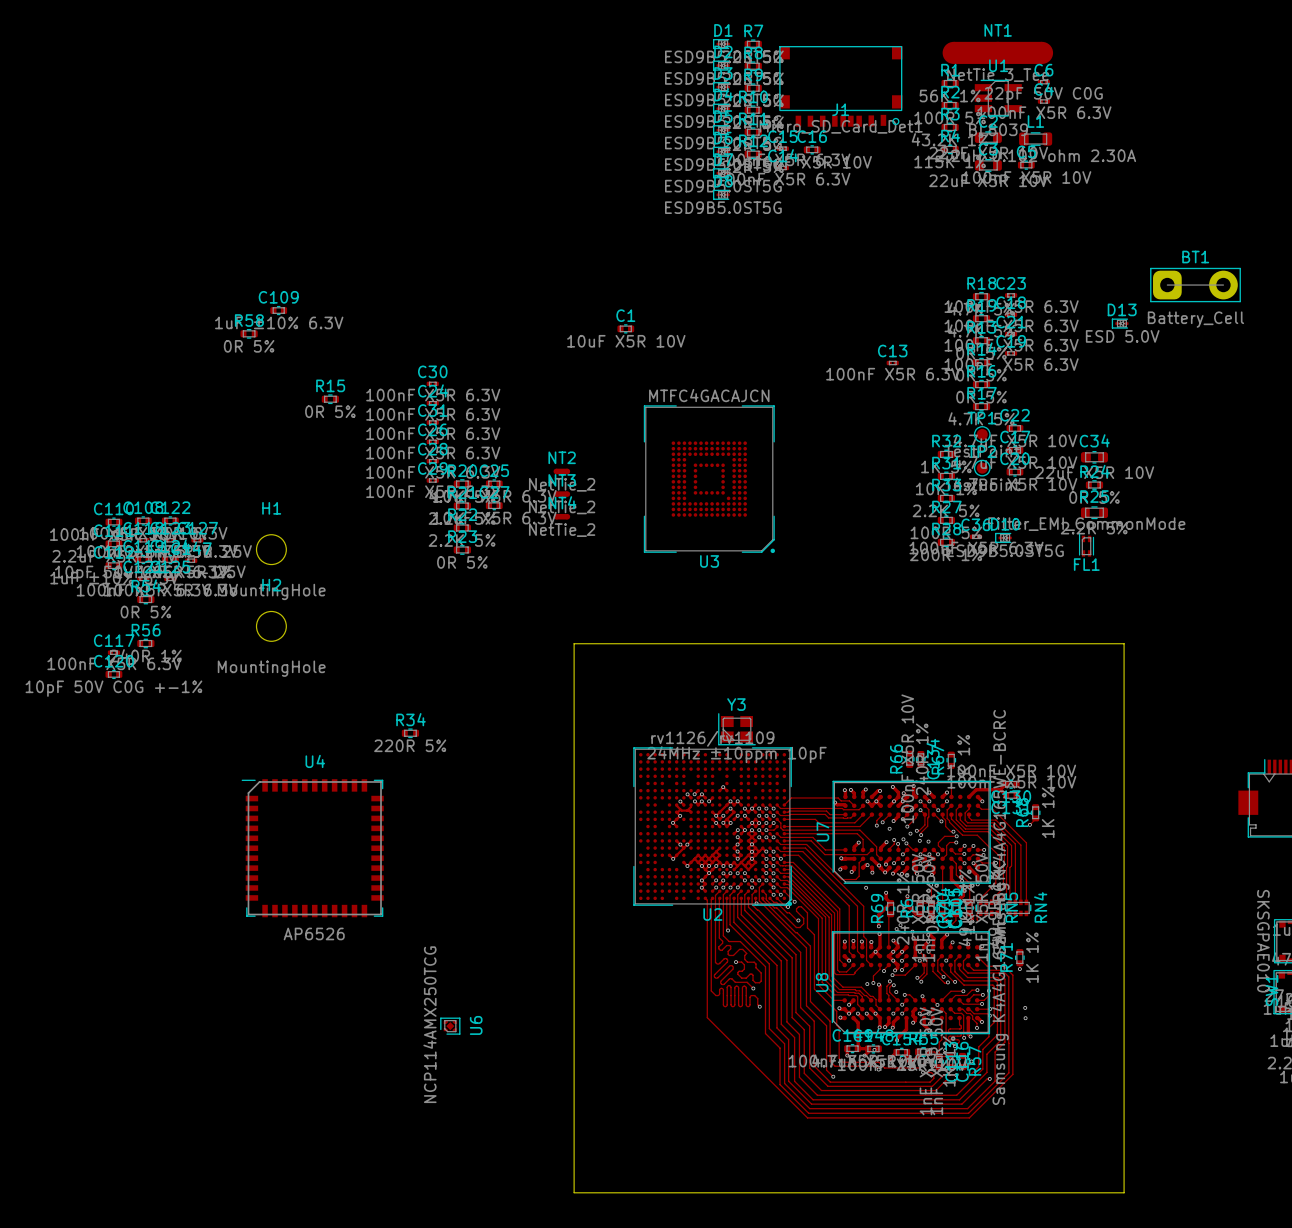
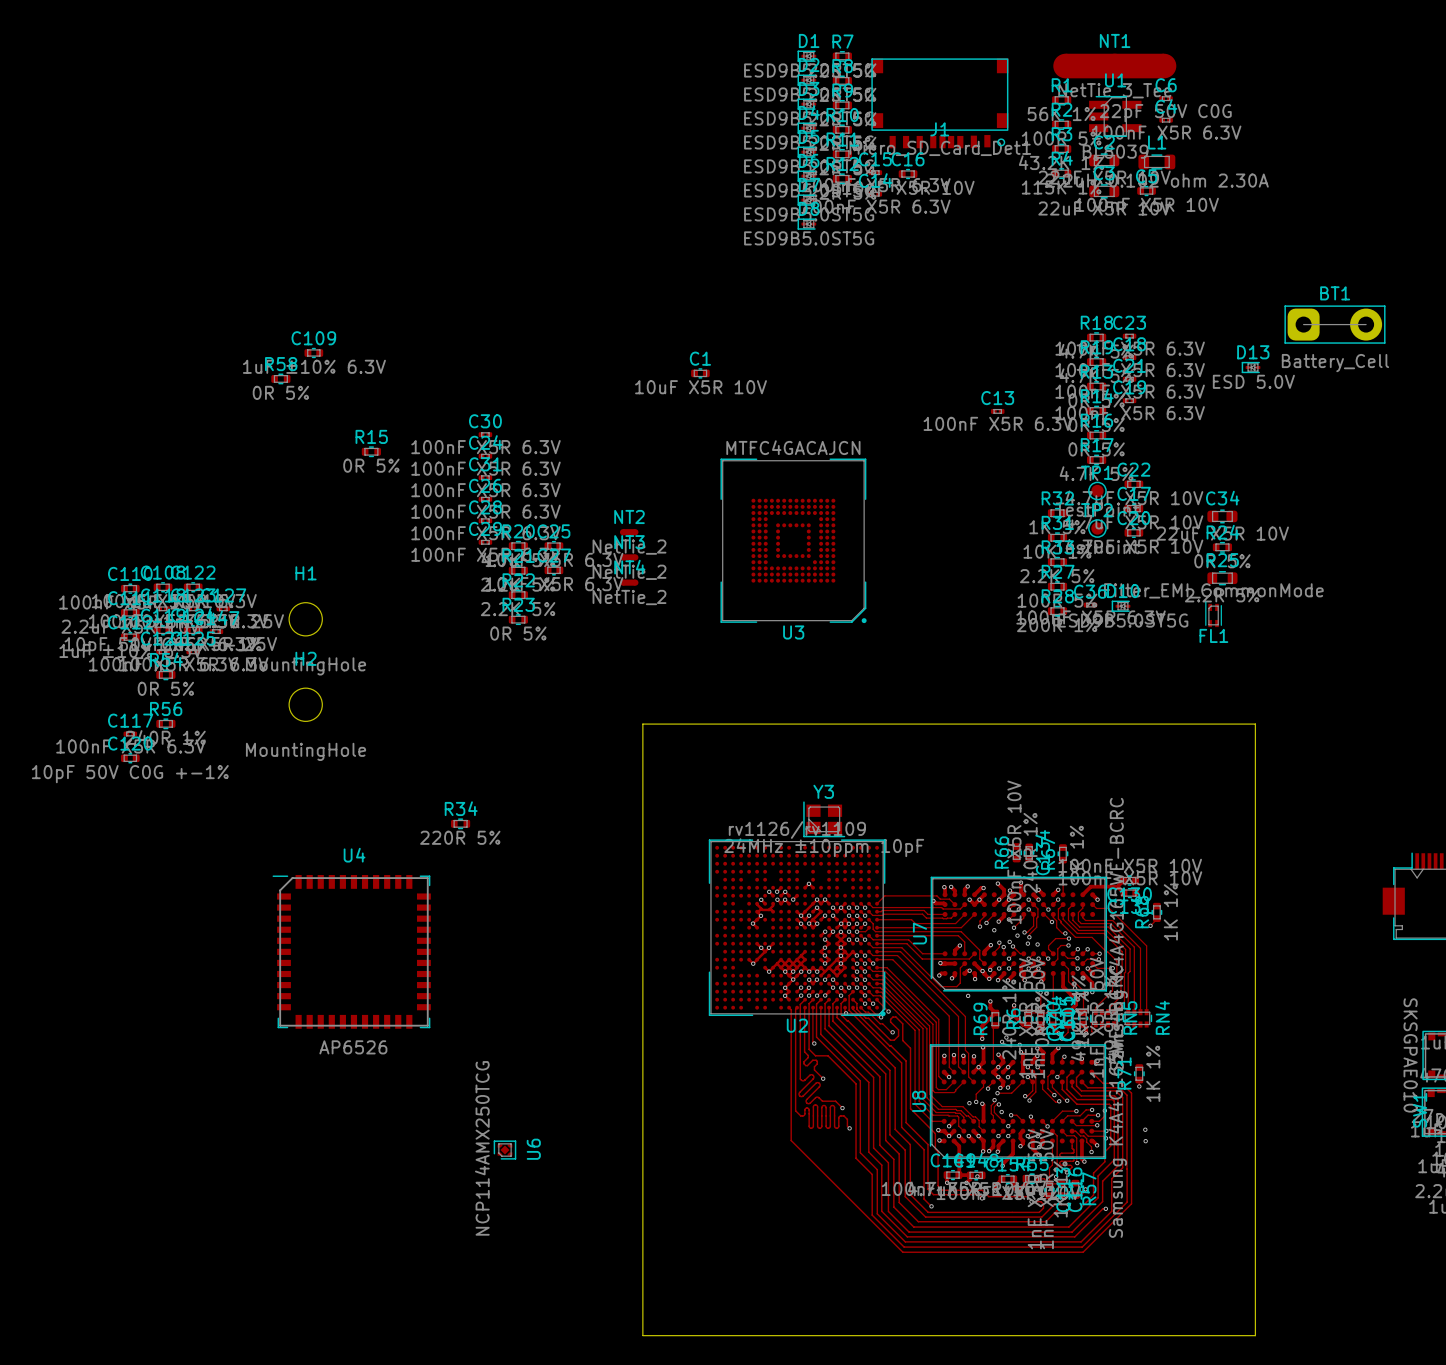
track: (729, 955) (733, 955) (739, 949) (742, 949) (746, 953) (744, 959) (747, 962) (756, 963) (756, 967) (761, 973) (761, 981) (755, 982) (751, 974) (746, 978) (741, 978) (737, 972) (744, 969) (744, 964) (741, 962) (736, 962) -> (815, 1071) (823, 1078)

